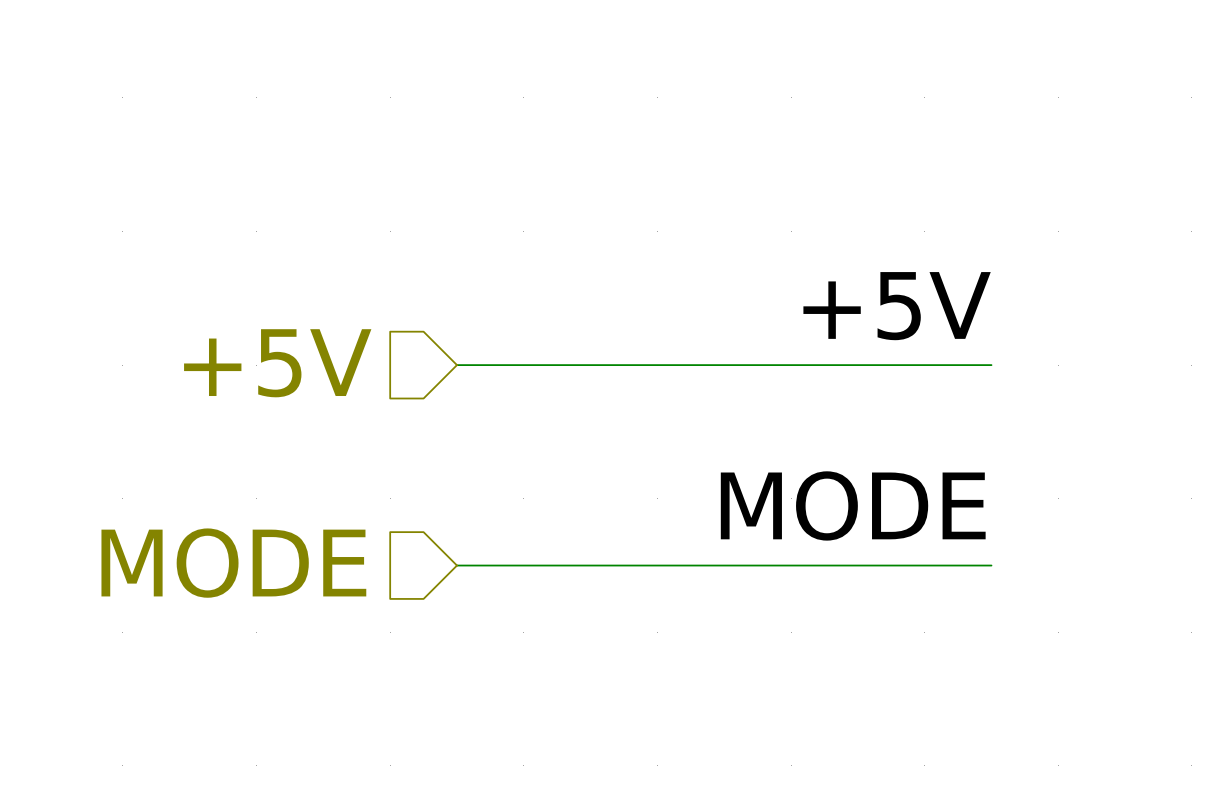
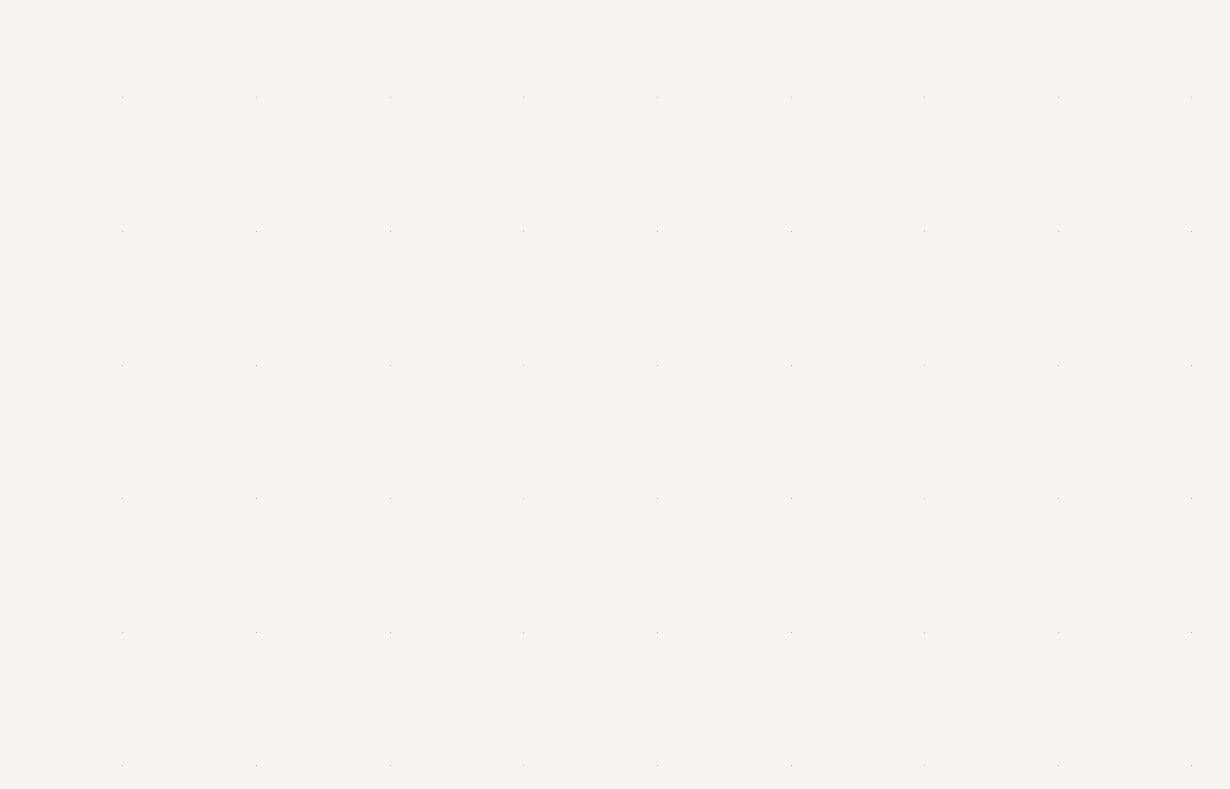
label: +5V (897, 306) -> none
hierarchical label: +5V (277, 363) -> none
wire: (456, 365) (991, 365) -> none
label: MODE (853, 505) -> none
hierarchical label: MODE (233, 563) -> none
wire: (456, 565) (991, 565) -> none

